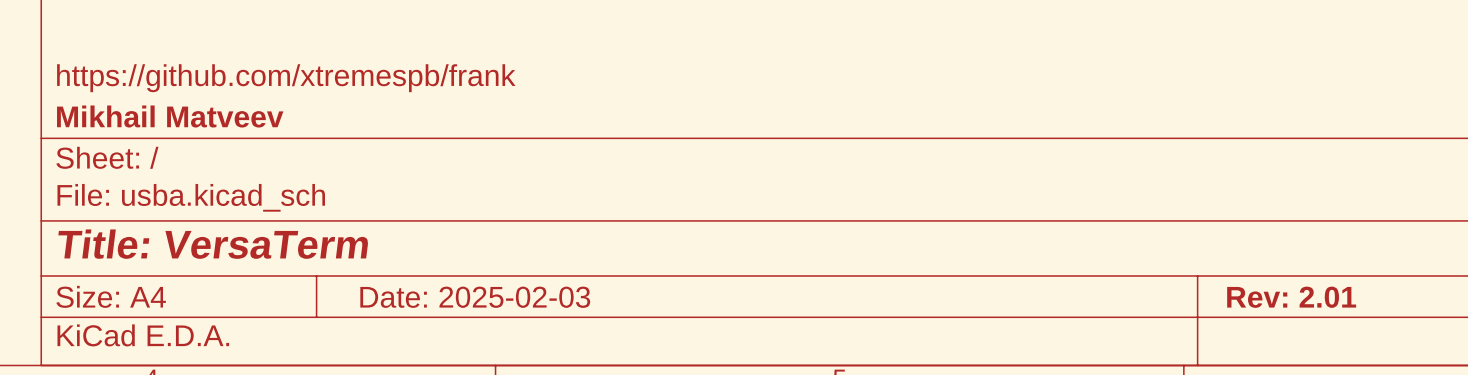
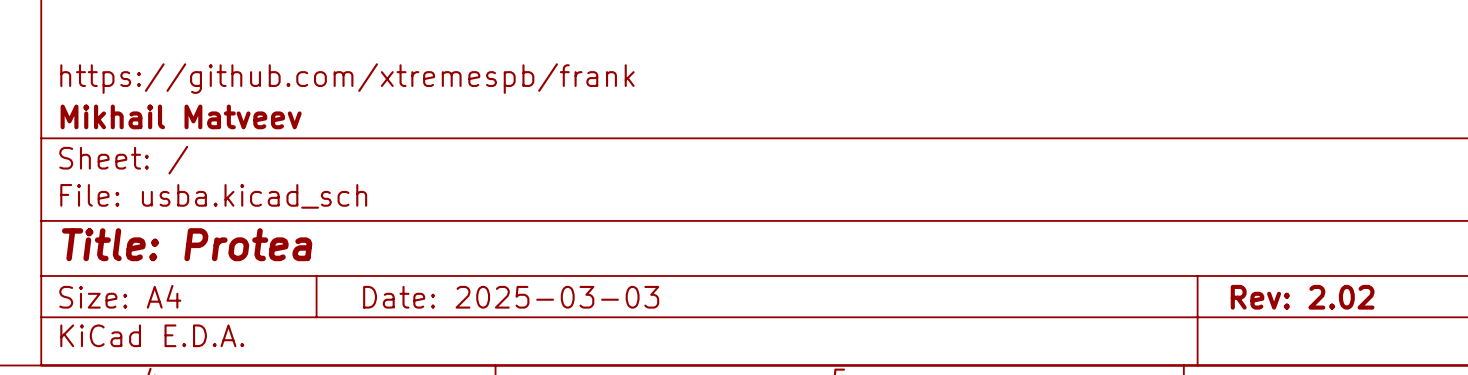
title block: Title: VersaTerm (213, 244) -> Title: Protea (187, 244)
title block: Date: 2025-02-03 (475, 297) -> Date: 2025-03-03 (511, 297)
title block: Rev: 2.01 (1291, 297) -> Rev: 2.02 (1302, 297)

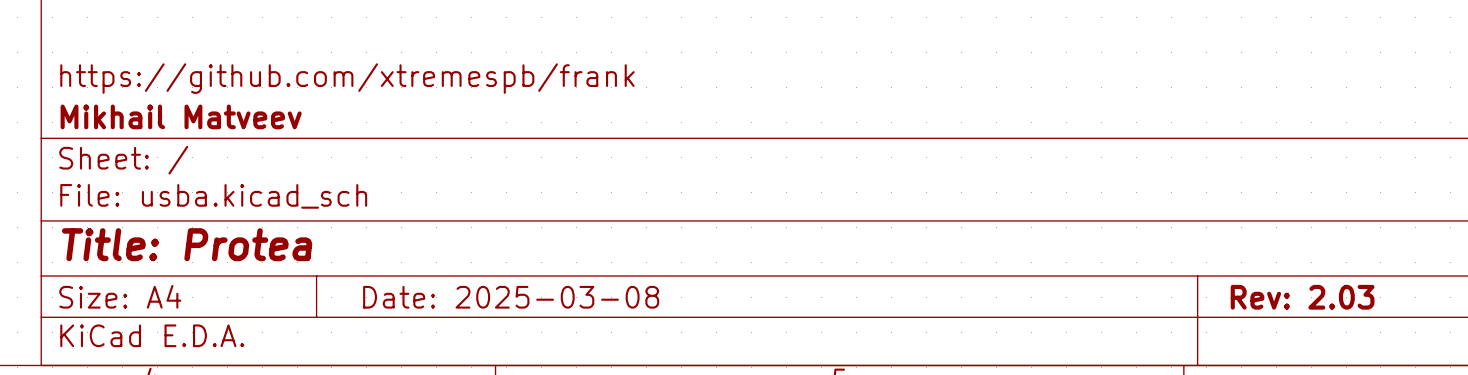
title block: Date: 2025-03-03 (511, 297) -> Date: 2025-03-08 (511, 297)
title block: Rev: 2.02 (1302, 297) -> Rev: 2.03 (1302, 297)

